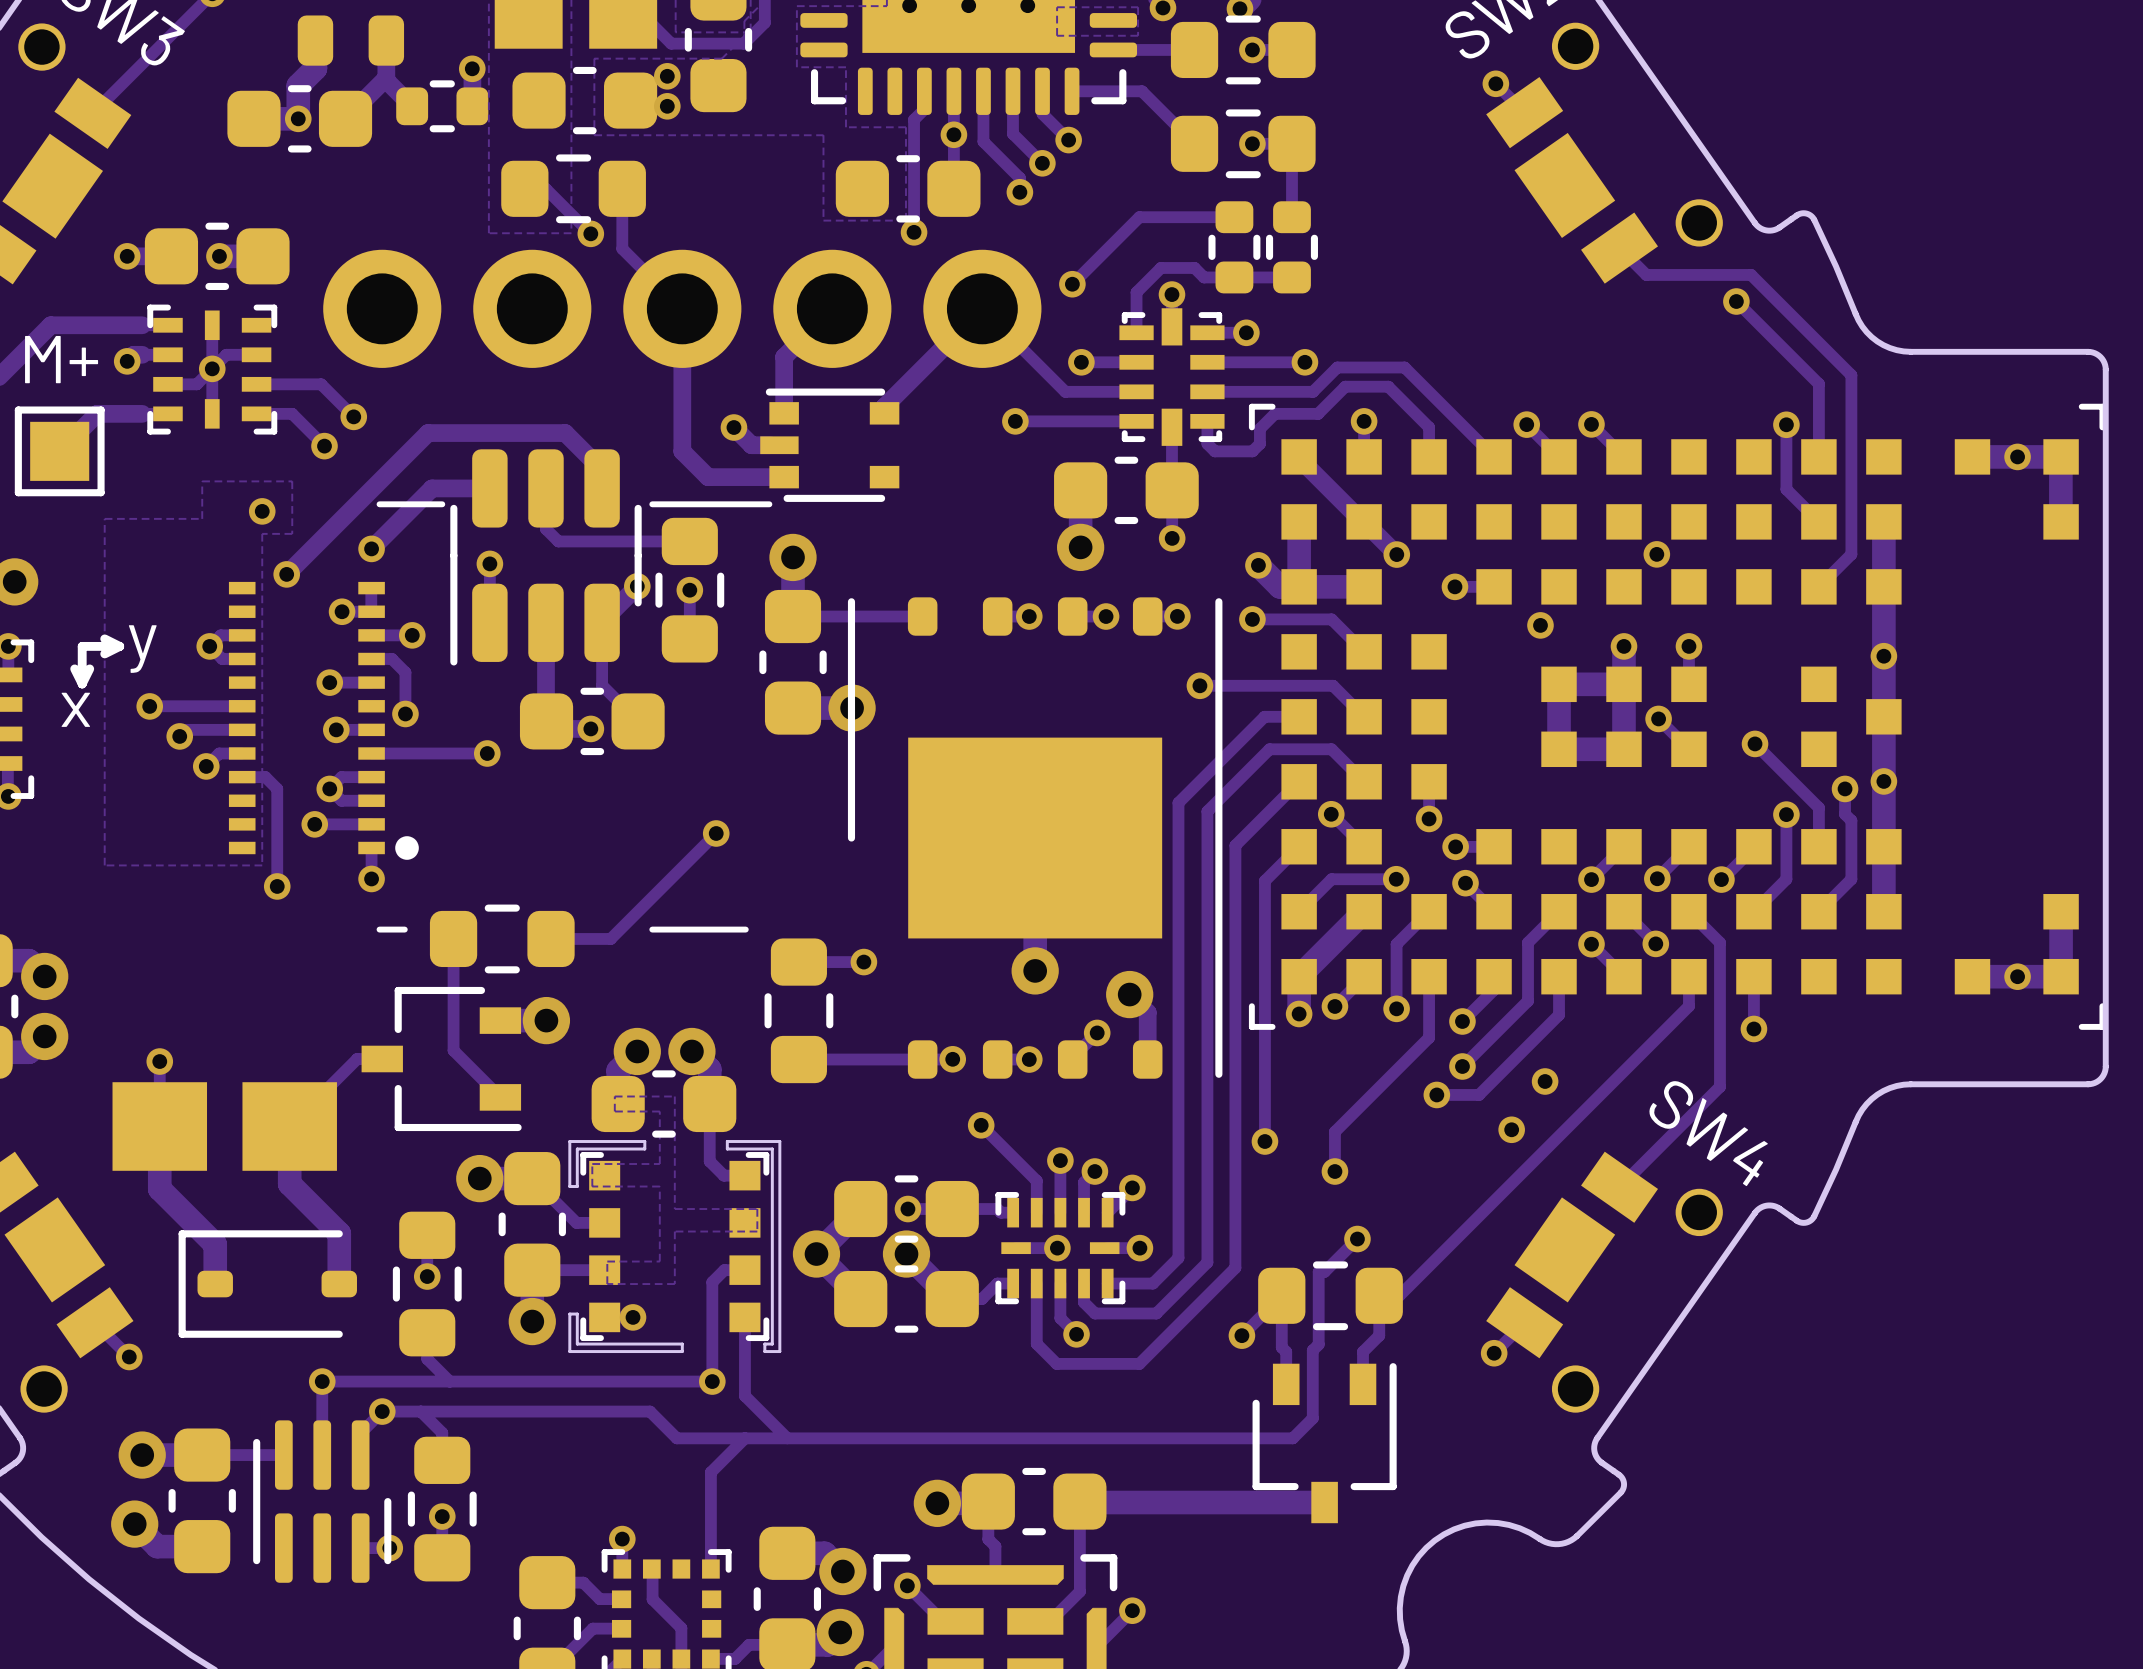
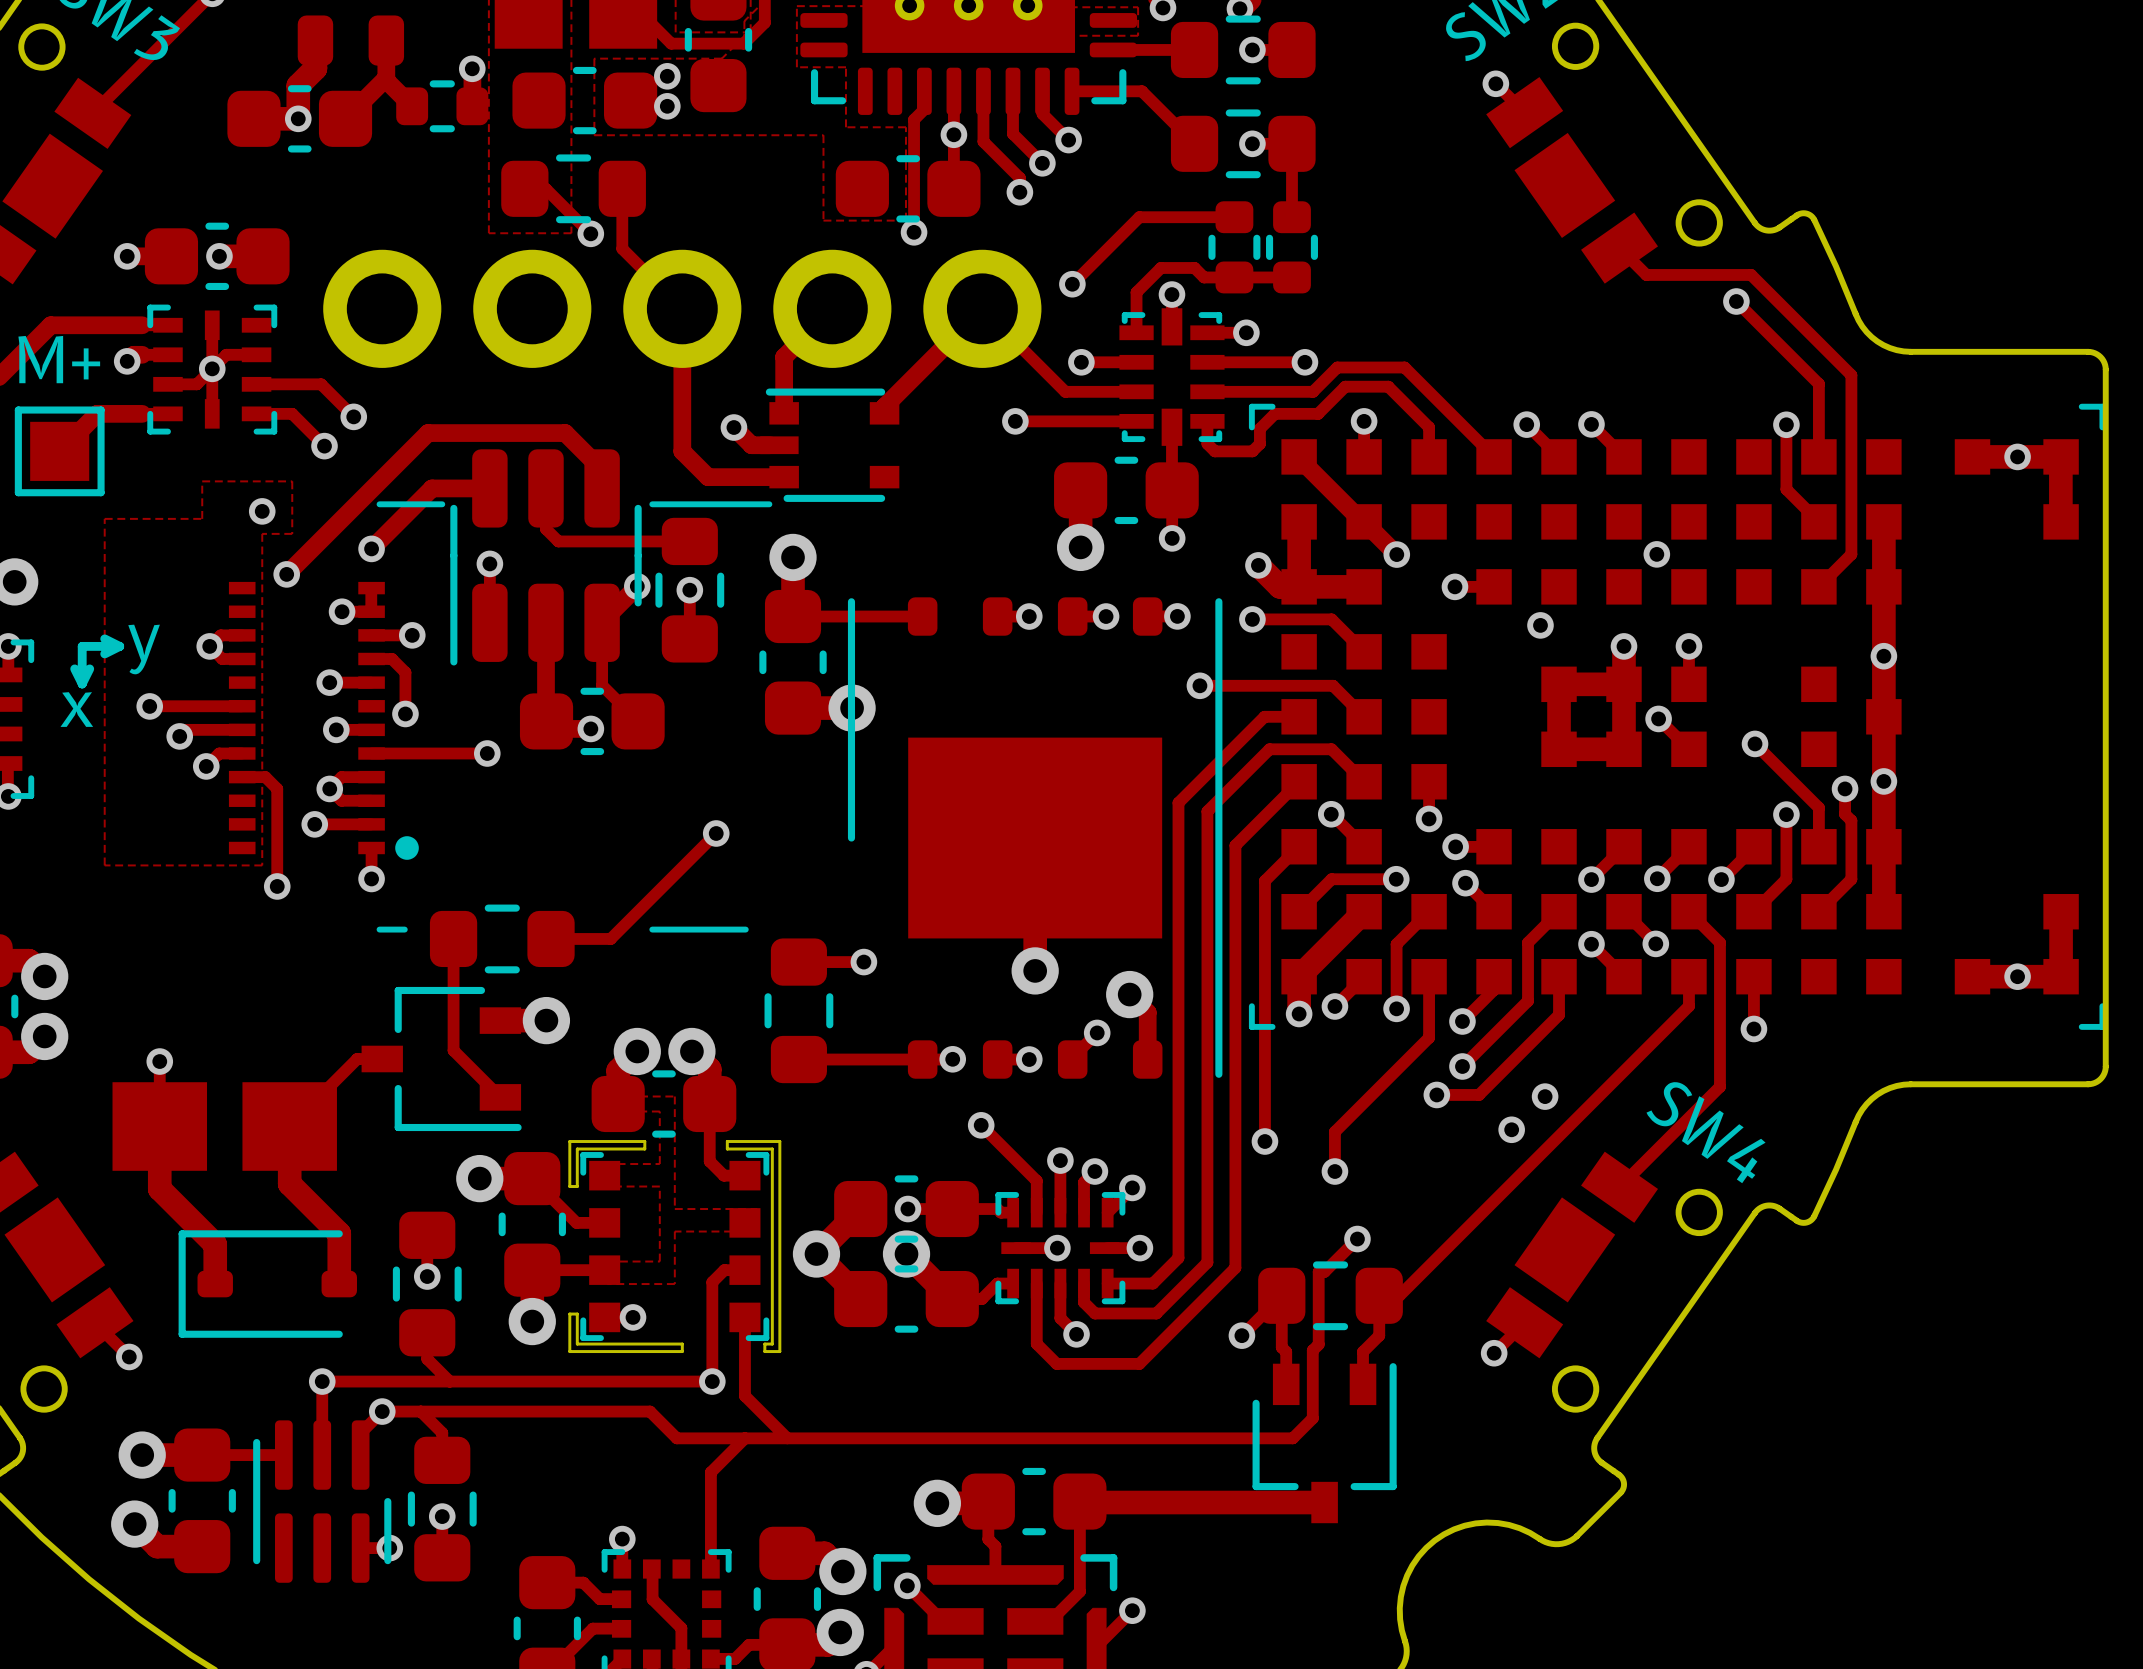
via position: (1545, 1081) -> (1545, 1096)

